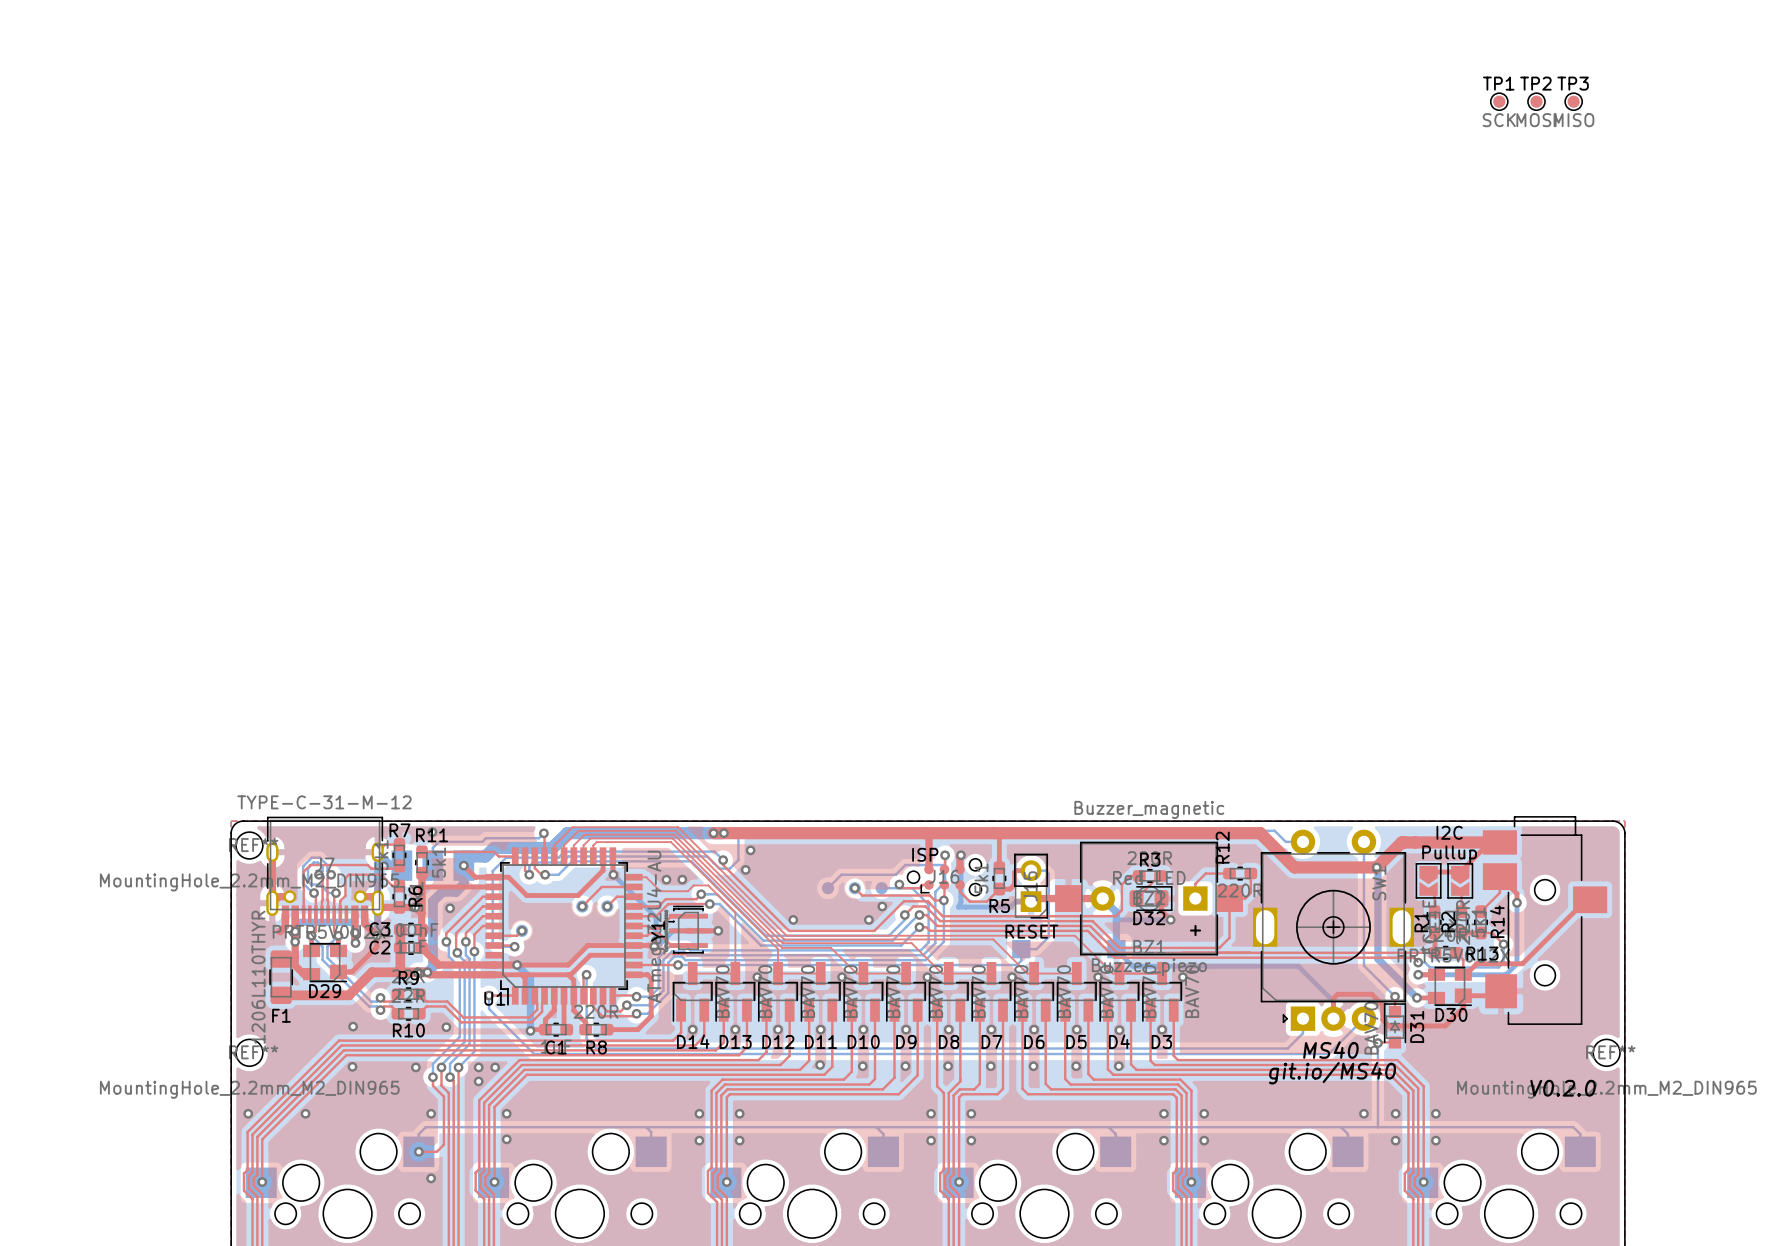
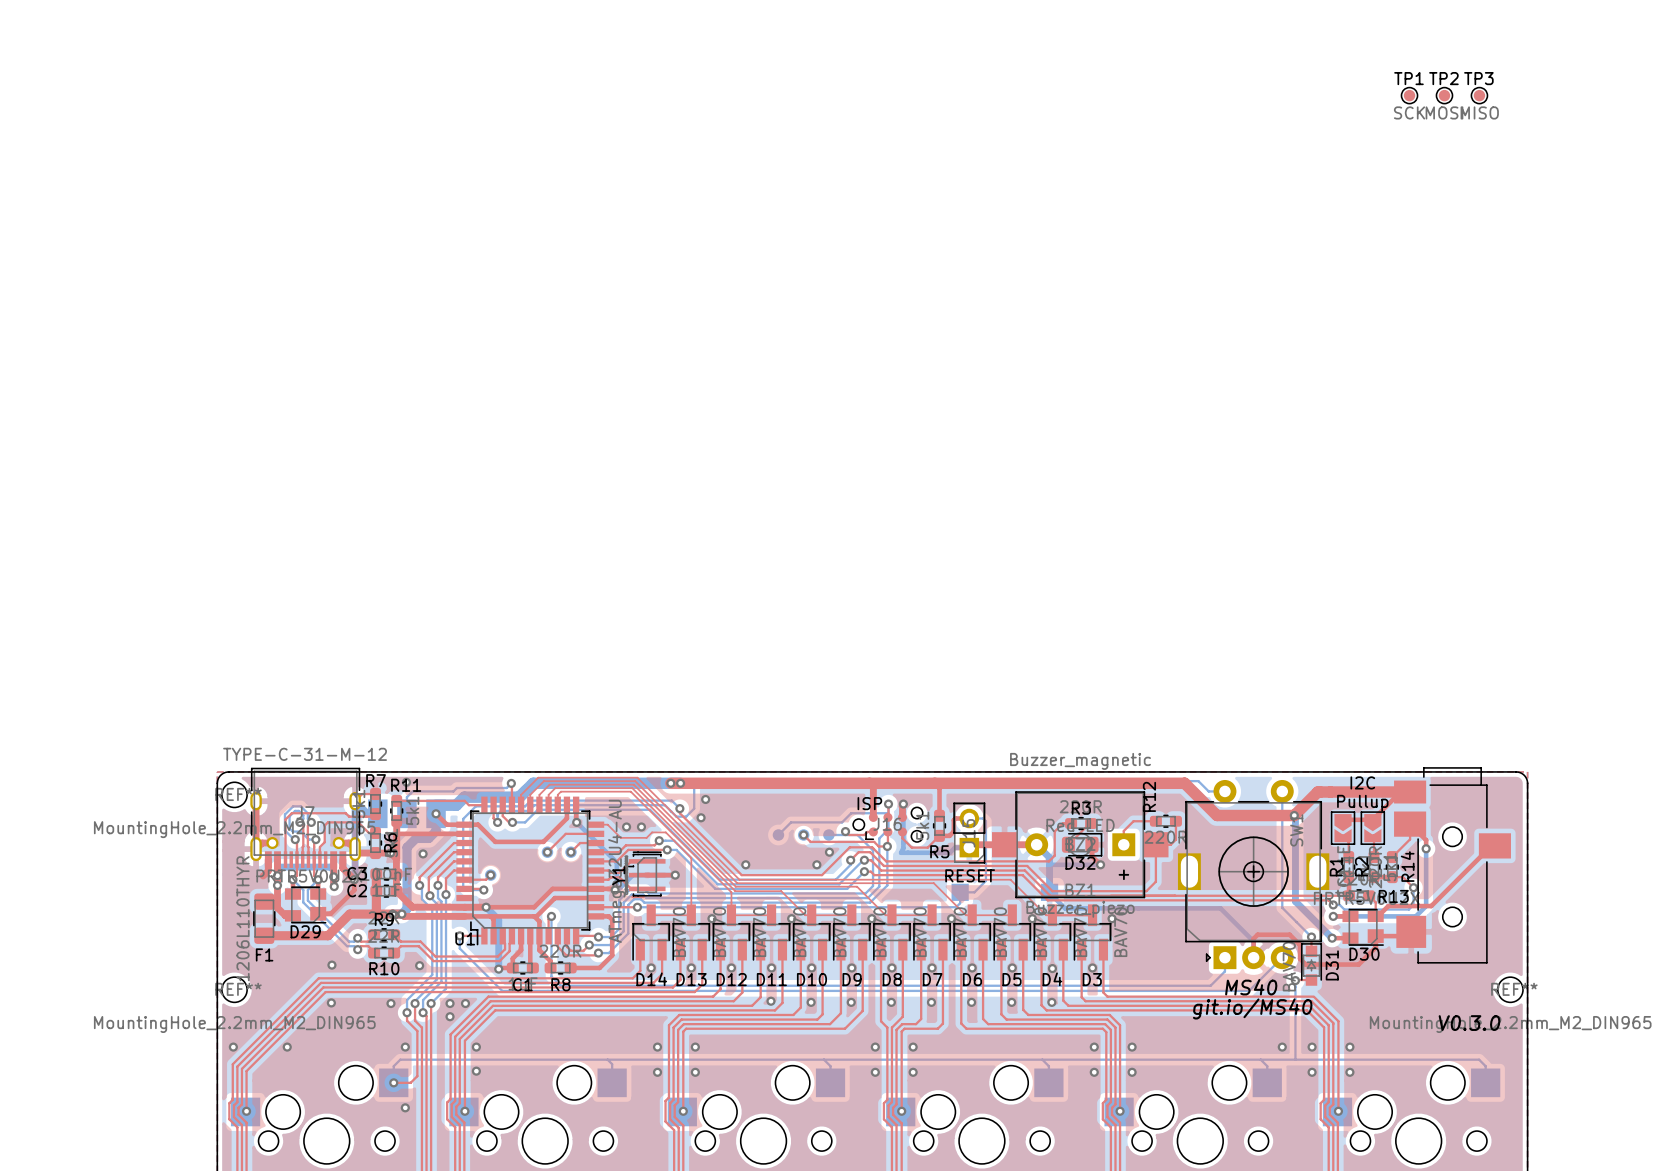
text: V0.2.0 (1563, 1088) -> V0.3.0 (1469, 1023)

